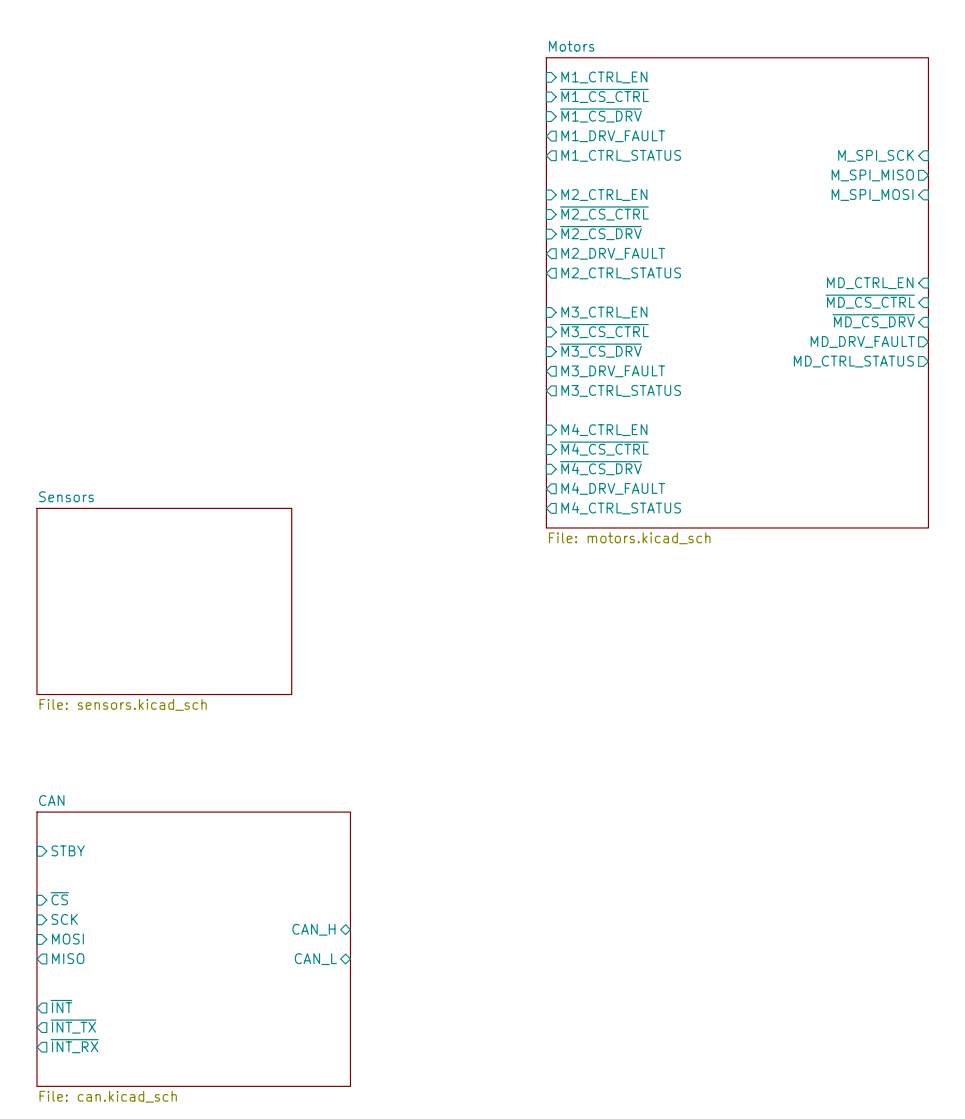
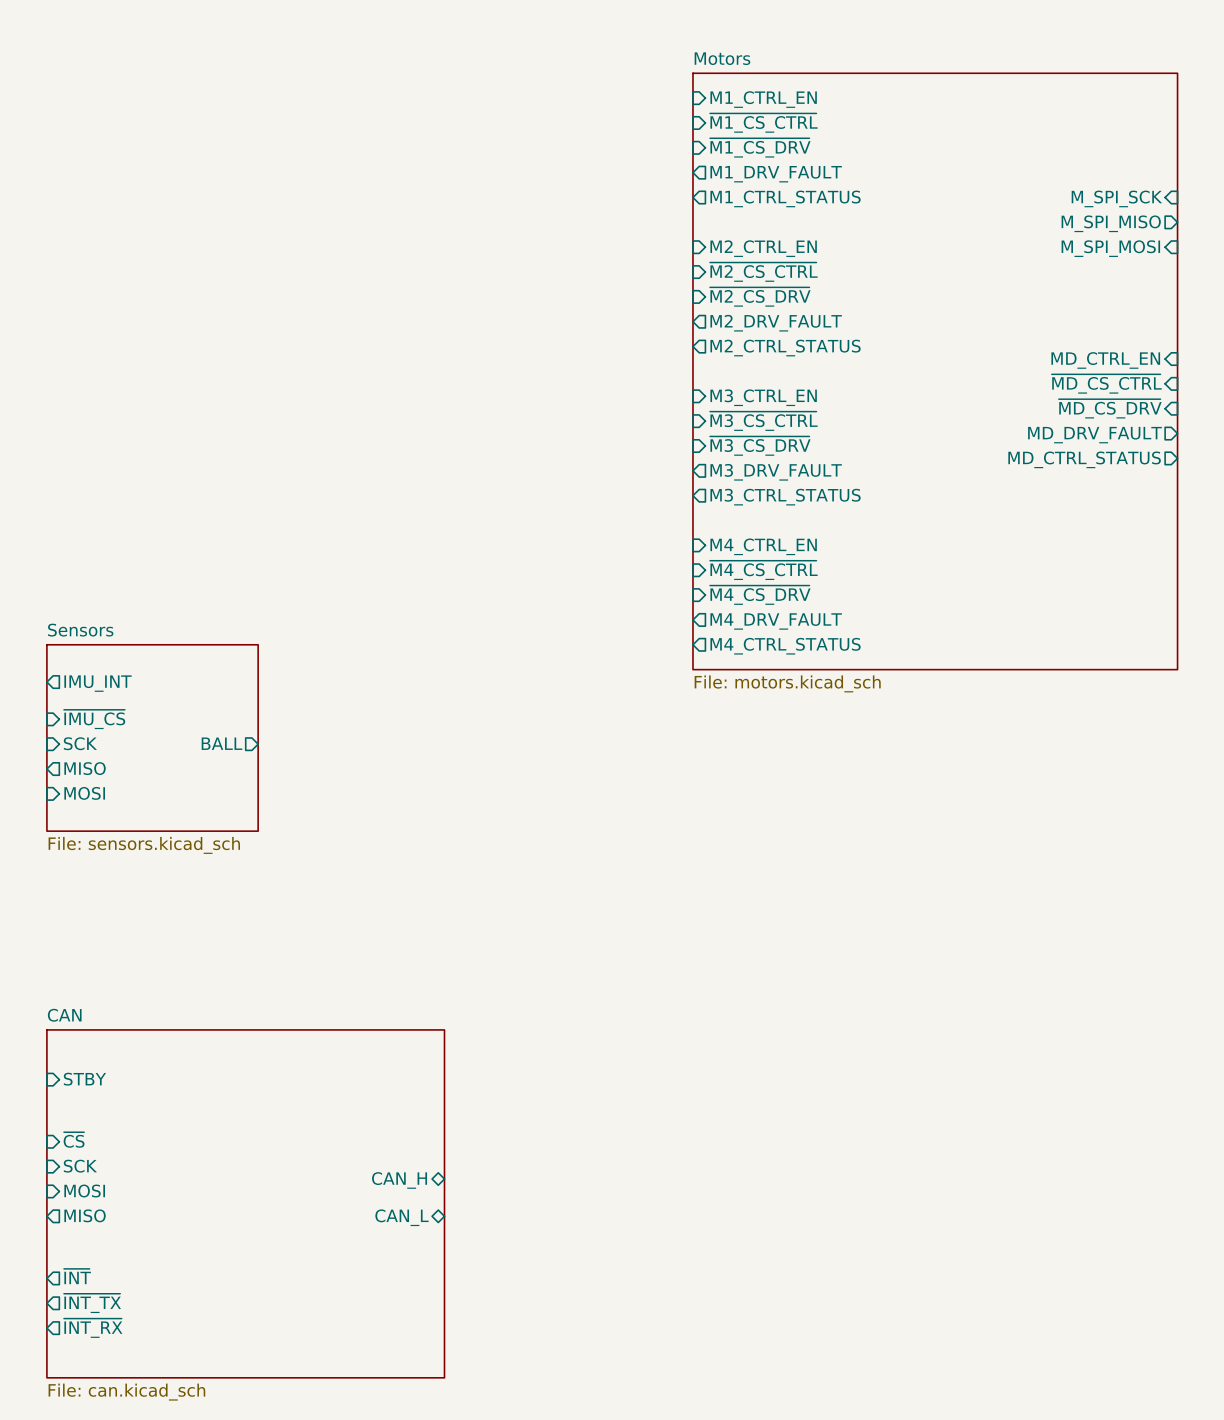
sheet pin: none -> IMU_INT (98, 683)
sheet pin: none -> ~{IMU_CS} (94, 719)
sheet Sensors: none -> File: sensors.kicad_sch (152, 737)
sheet pin: none -> SCK (80, 743)
sheet pin: none -> BALL (221, 743)
sheet Sensors: File: sensors.kicad_sch (164, 601) -> none
sheet pin: none -> MISO (85, 768)
sheet pin: none -> MOSI (84, 793)

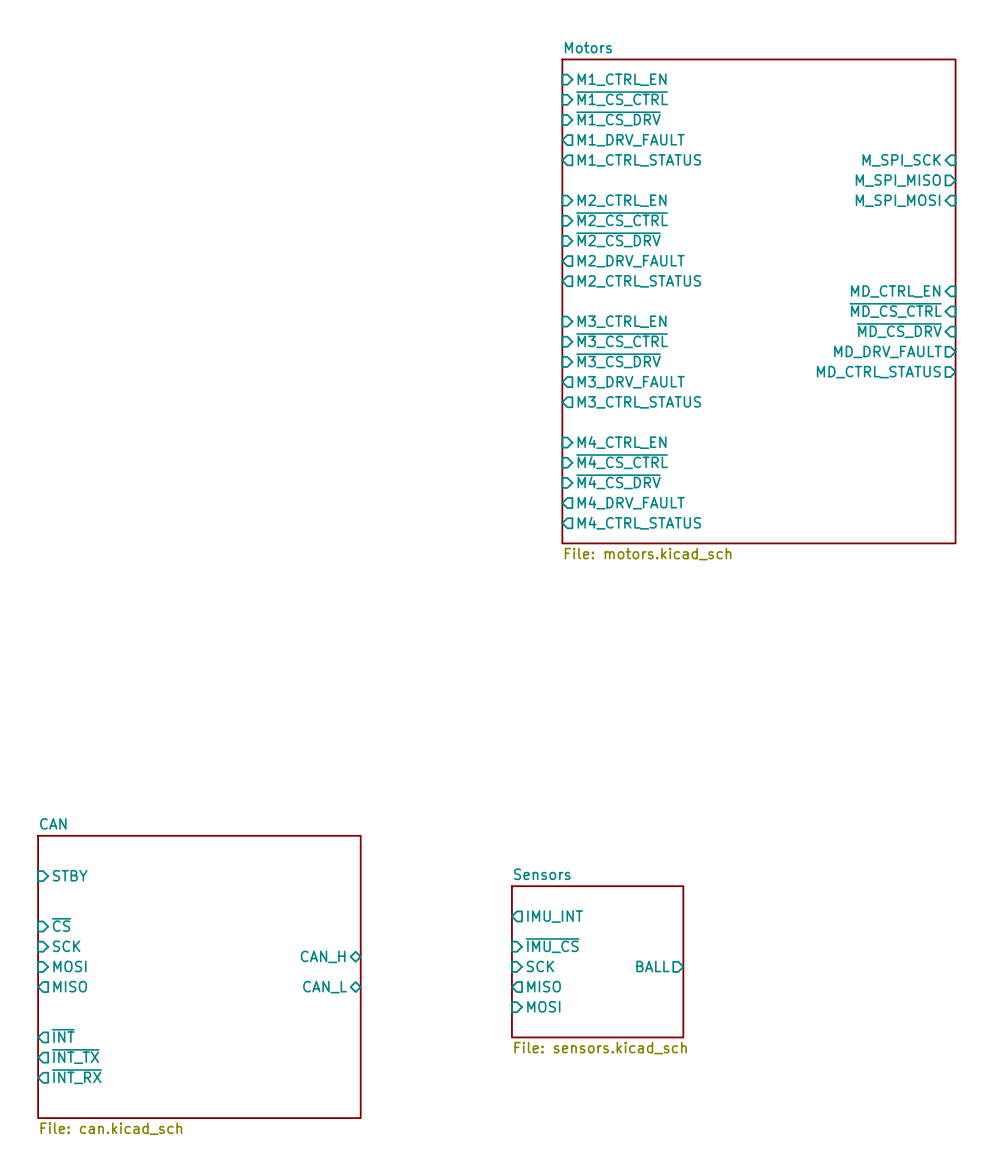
sheet pin: IMU_INT (98, 683) -> none
sheet pin: ~{IMU_CS} (94, 719) -> none
sheet Sensors: File: sensors.kicad_sch (152, 737) -> none
sheet pin: SCK (80, 743) -> none
sheet pin: BALL (221, 743) -> none
sheet pin: MISO (85, 768) -> none
sheet pin: MOSI (84, 793) -> none
sheet pin: none -> IMU_INT (555, 916)
sheet pin: none -> ~{IMU_CS} (552, 945)
sheet Sensors: none -> File: sensors.kicad_sch (597, 961)
sheet pin: none -> BALL (652, 966)
sheet pin: none -> SCK (540, 966)
sheet pin: none -> MISO (544, 986)
sheet pin: none -> MOSI (543, 1006)

